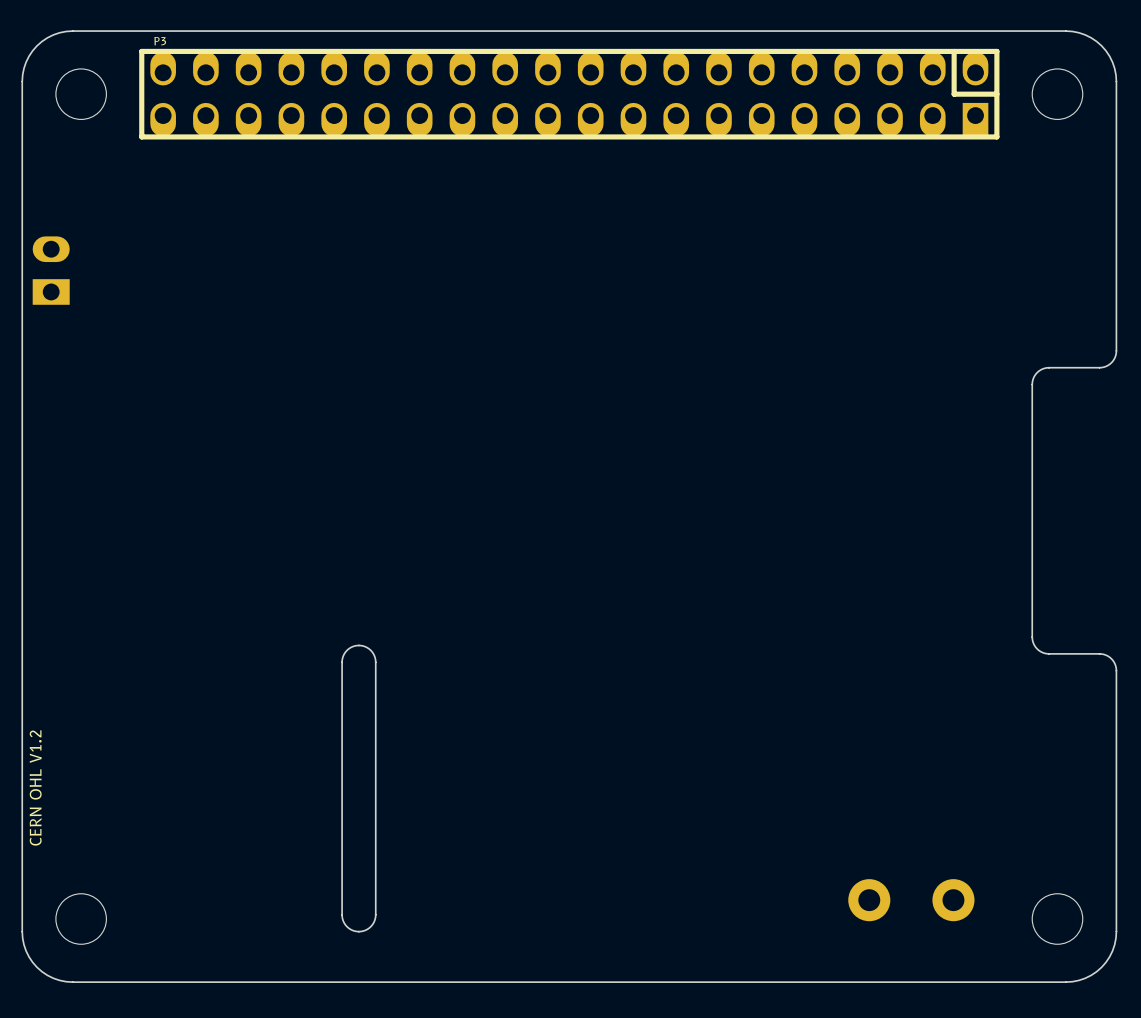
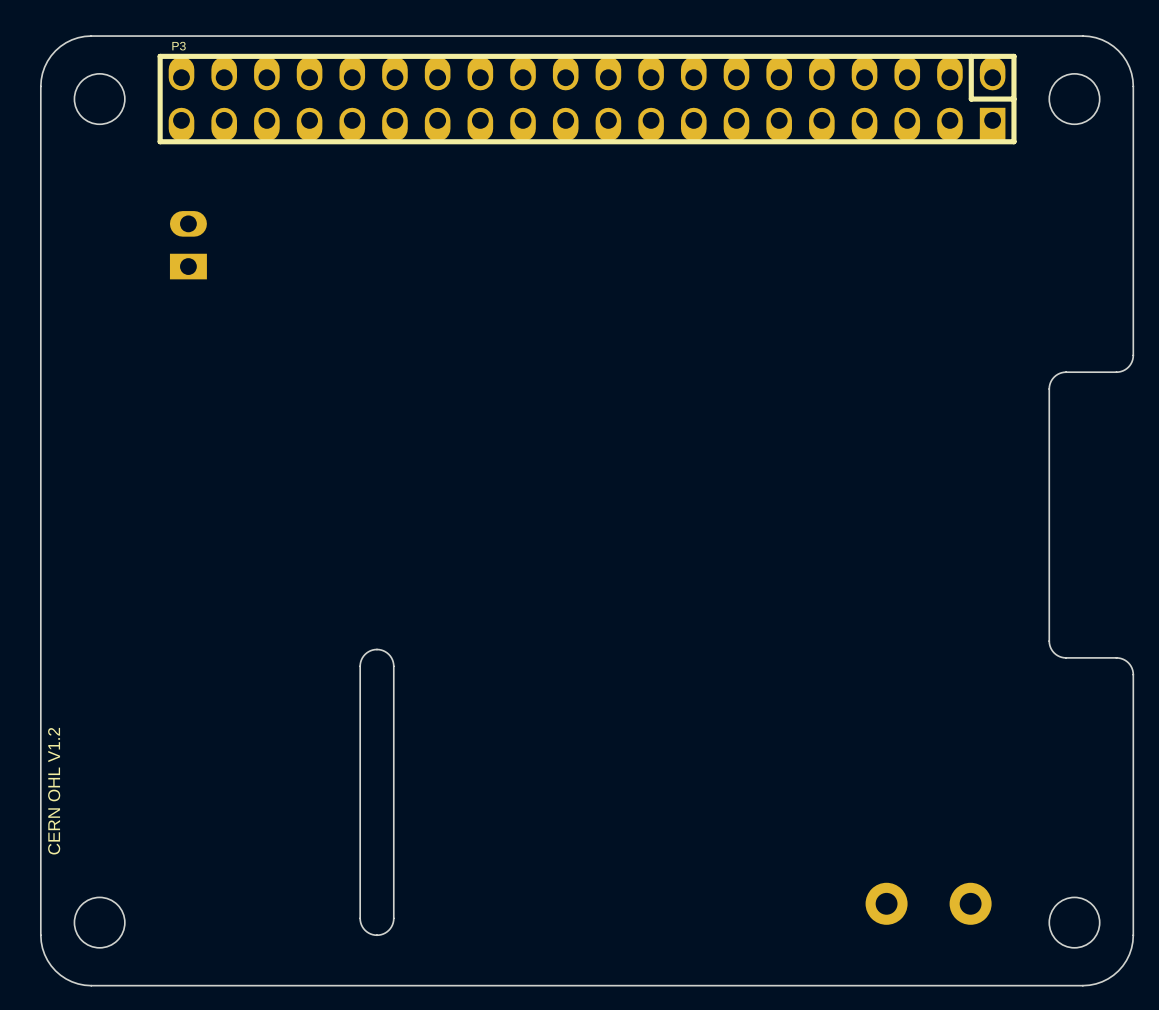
part position: (51, 270) -> (188, 245)

